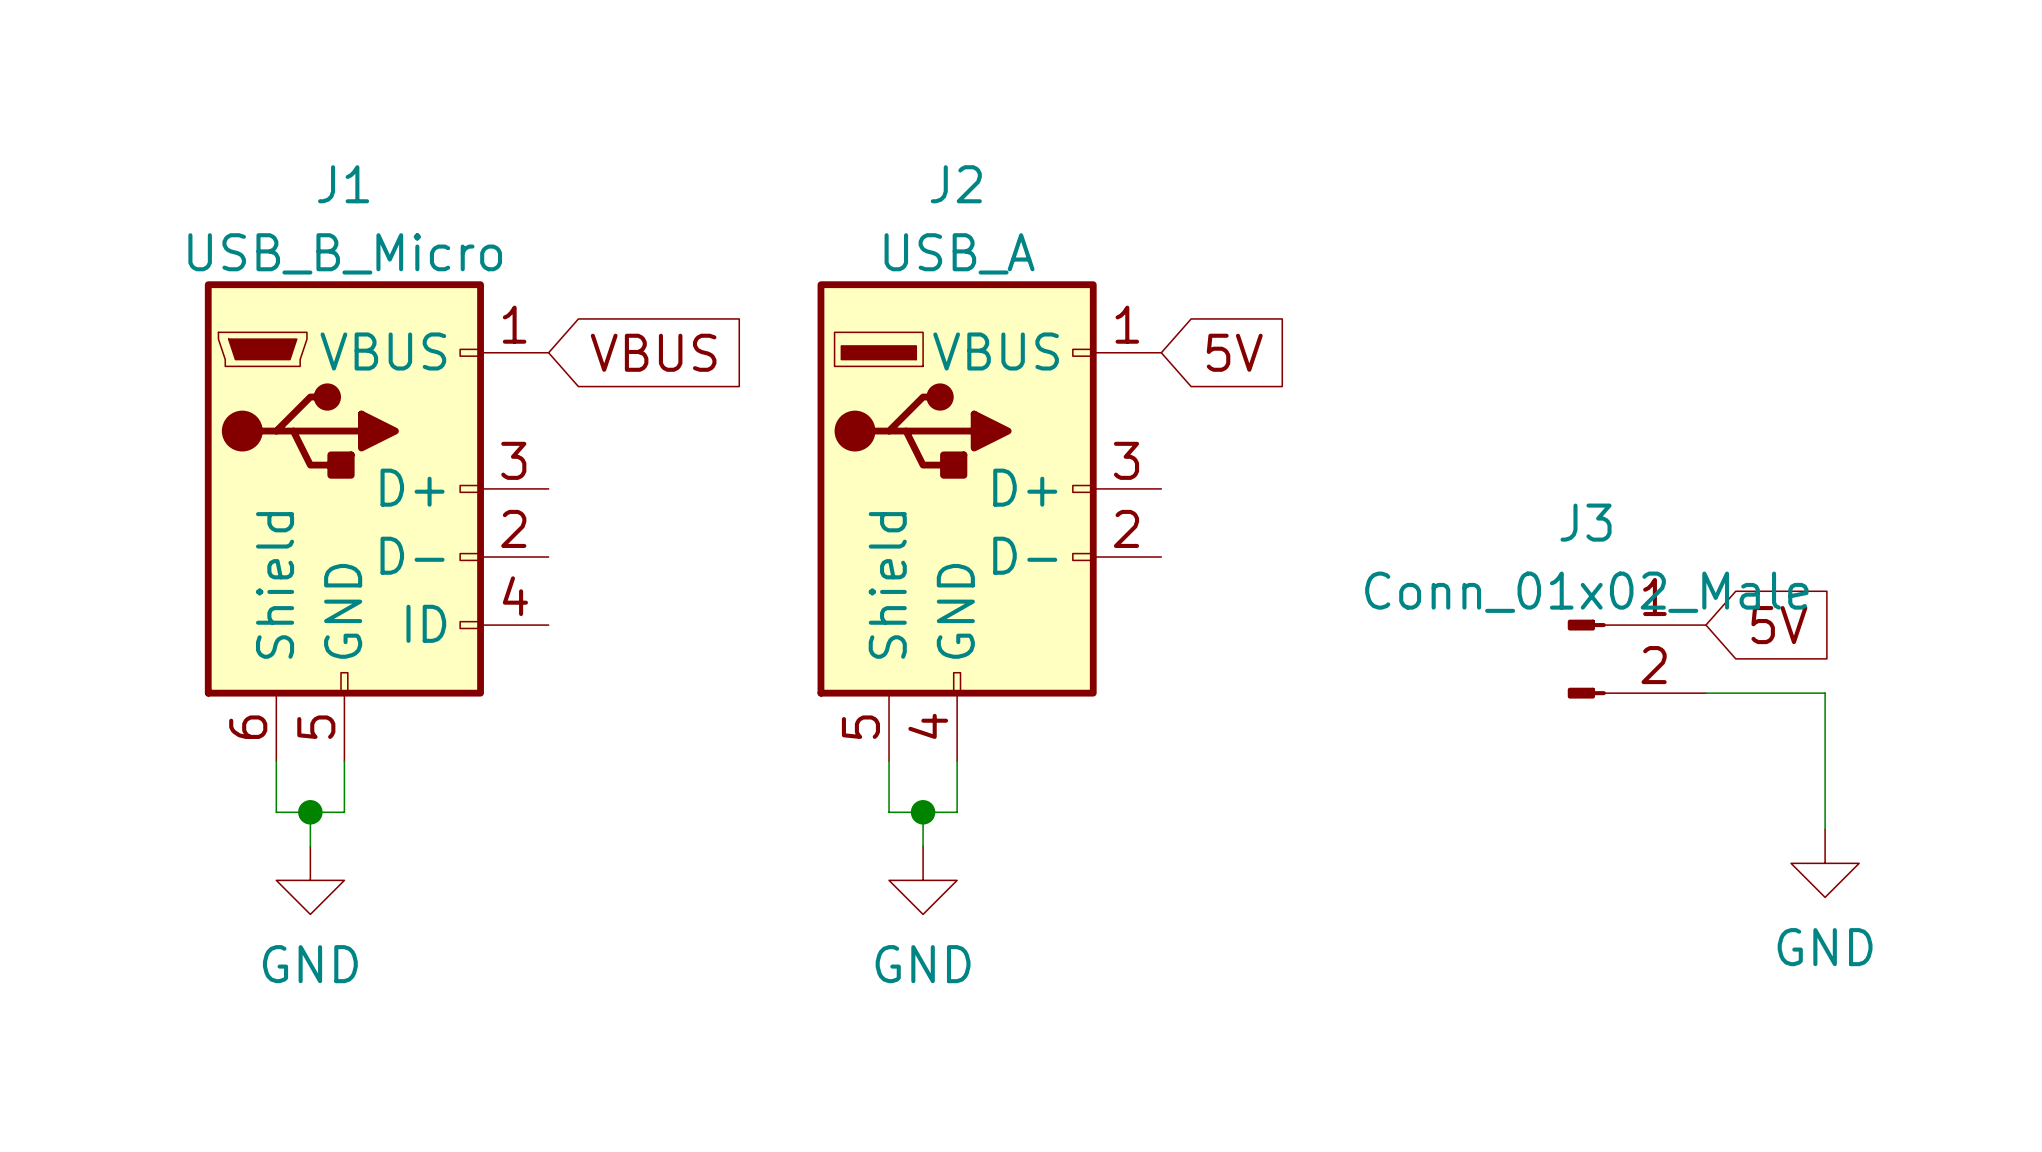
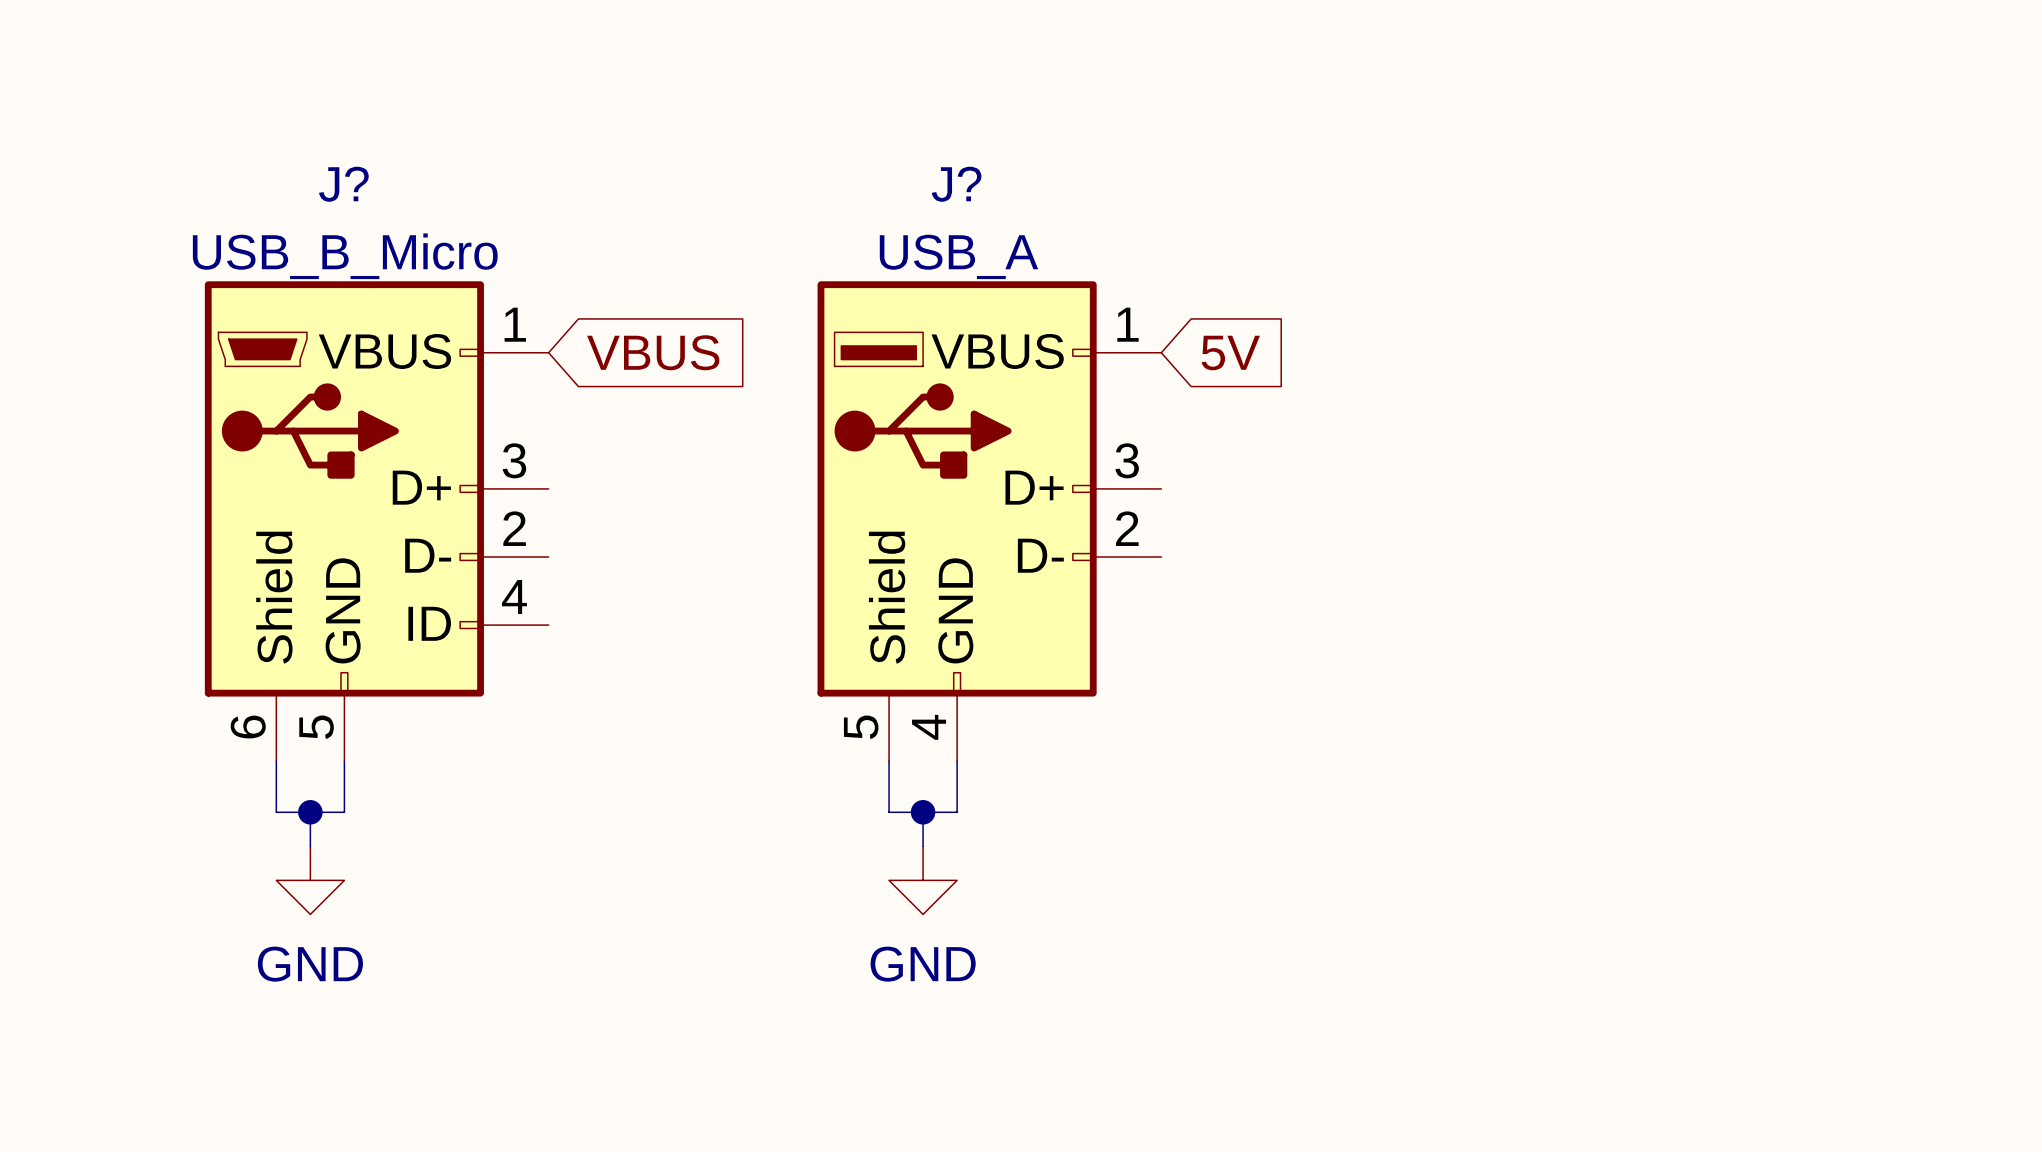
J1 name: J1 (343, 184) -> J? (343, 184)
J2 name: J2 (956, 184) -> J? (956, 184)
global label: 5V (1779, 625) -> none
J3: Conn_01x02_Male (1636, 659) -> none
wire: (1705, 693) (1825, 693) (1825, 829) -> none
power symbol: GND (1825, 863) -> none

